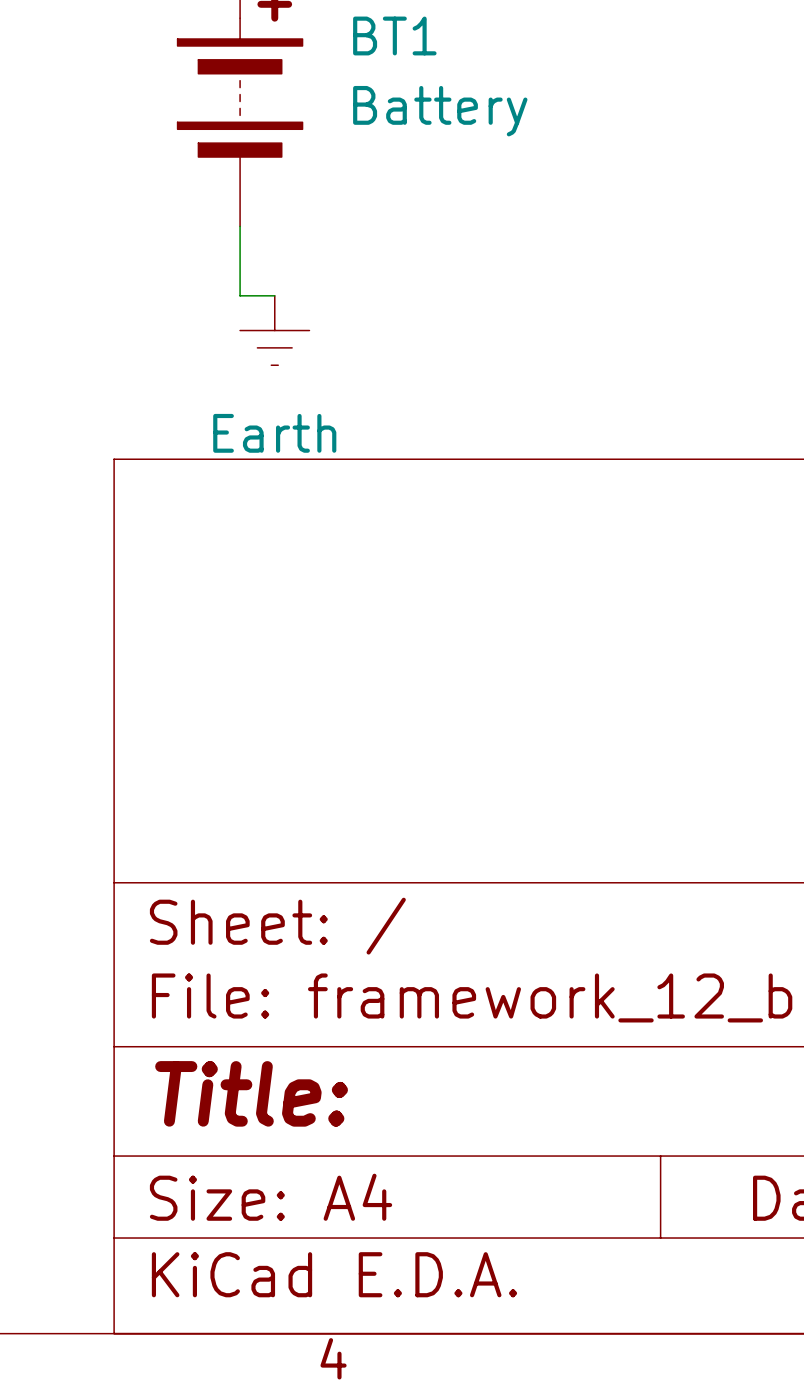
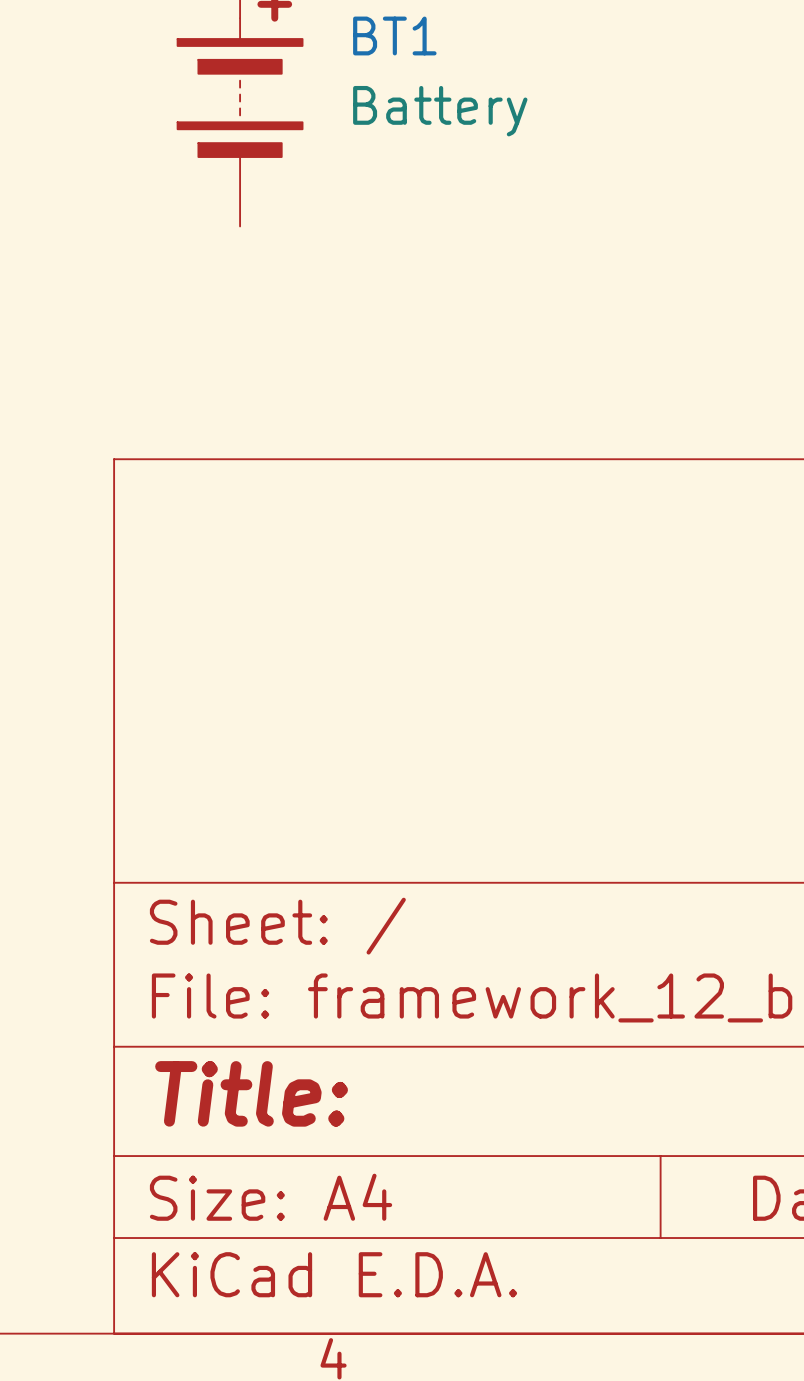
wire: (240, 226) (240, 295) (274, 295) -> none
power symbol: Earth (274, 330) -> none

